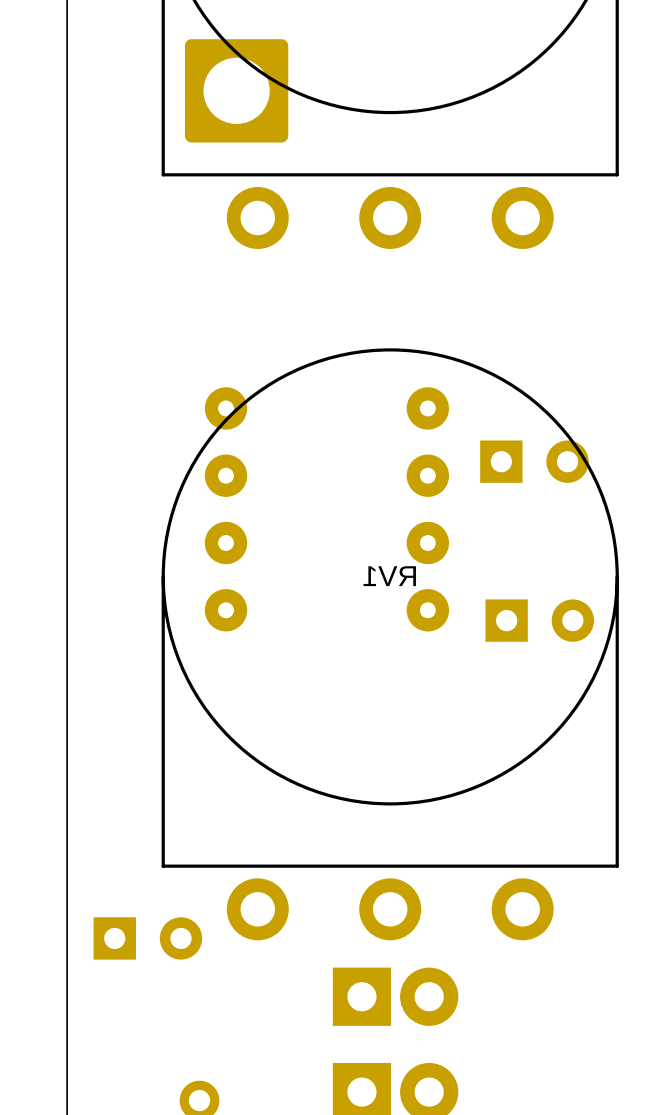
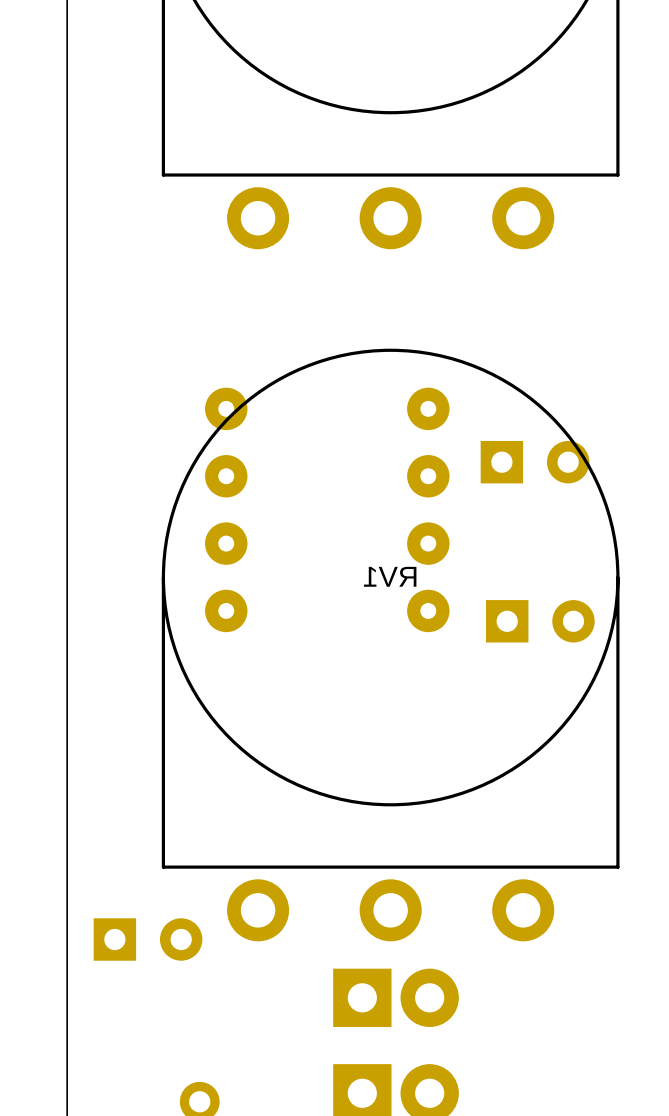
part: (236, 90) -> none

